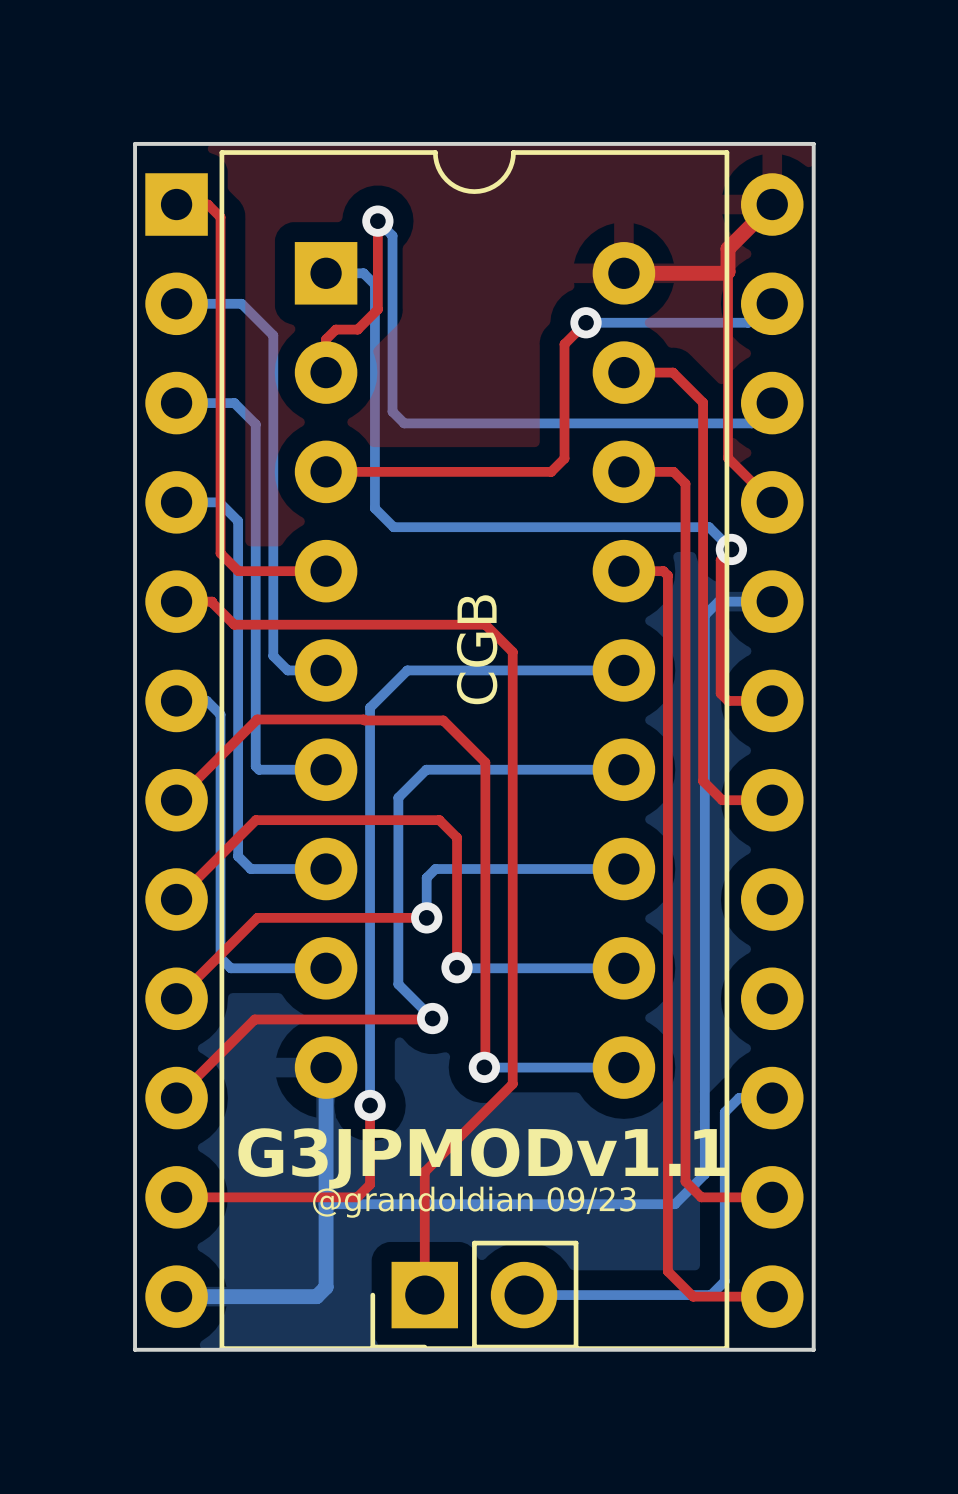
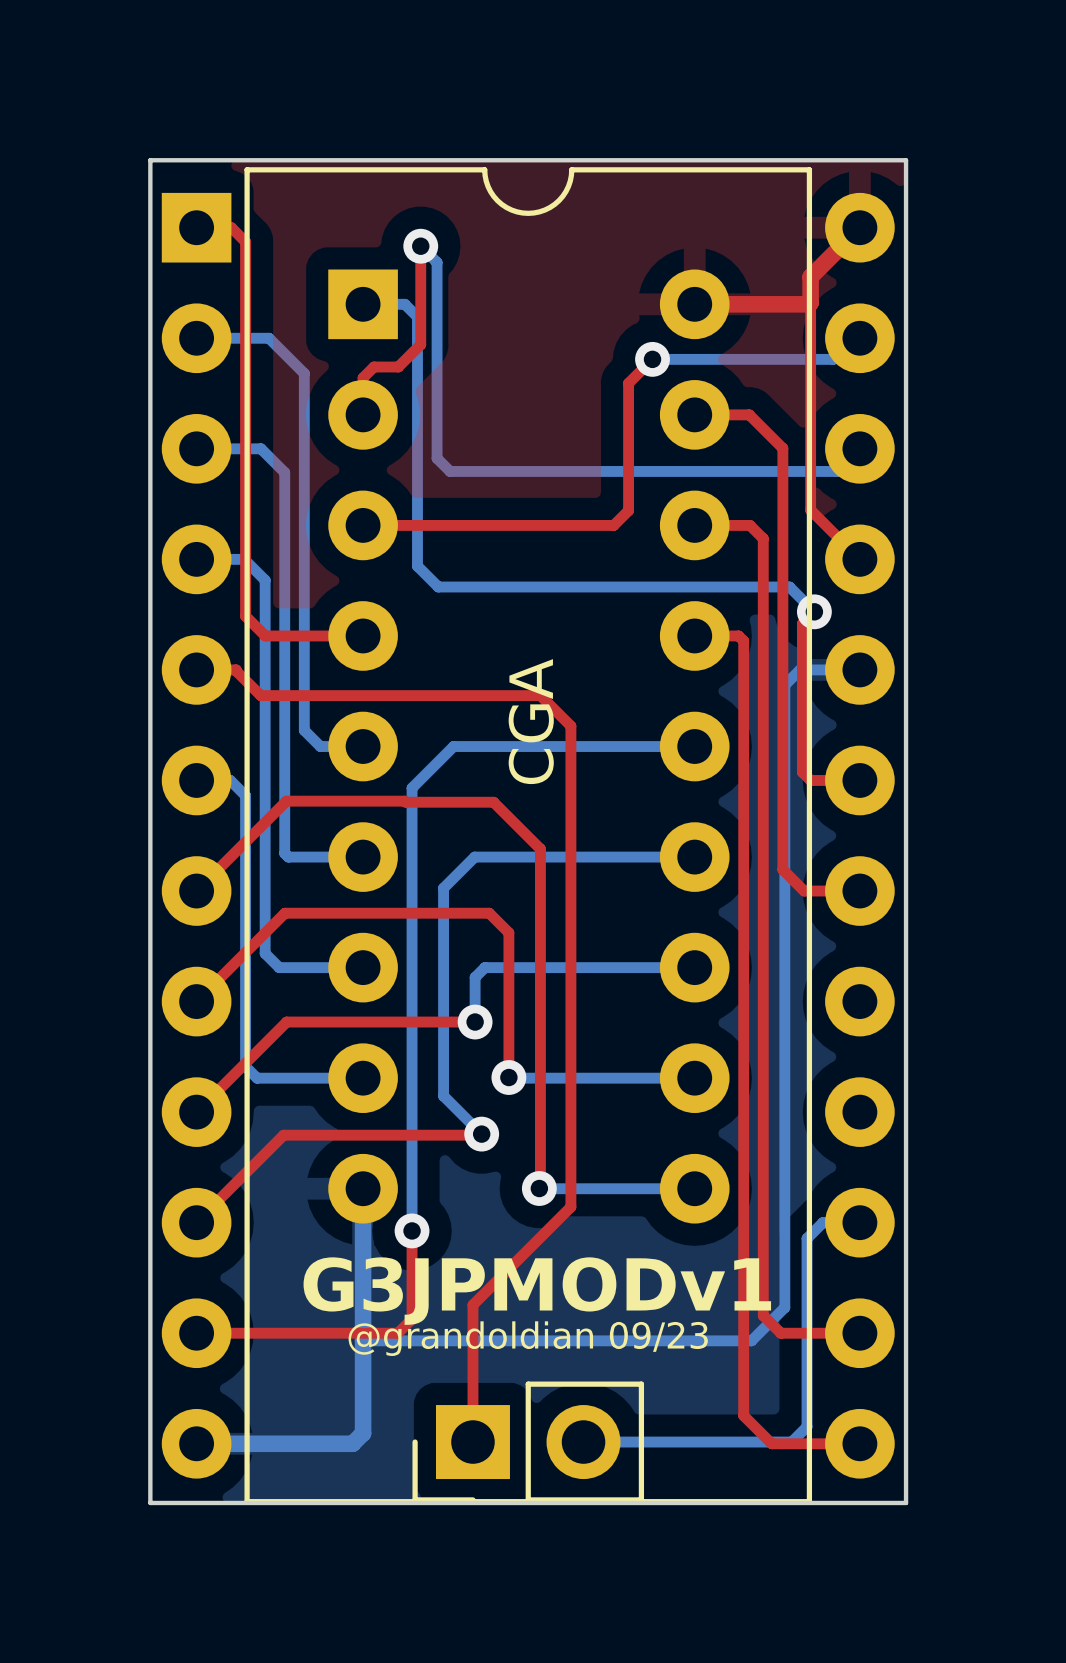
part value: CGB (477, 649) -> CGA (531, 721)
text: G3JPMODv1.1 (482, 1158) -> G3JPMODv1 (537, 1291)

